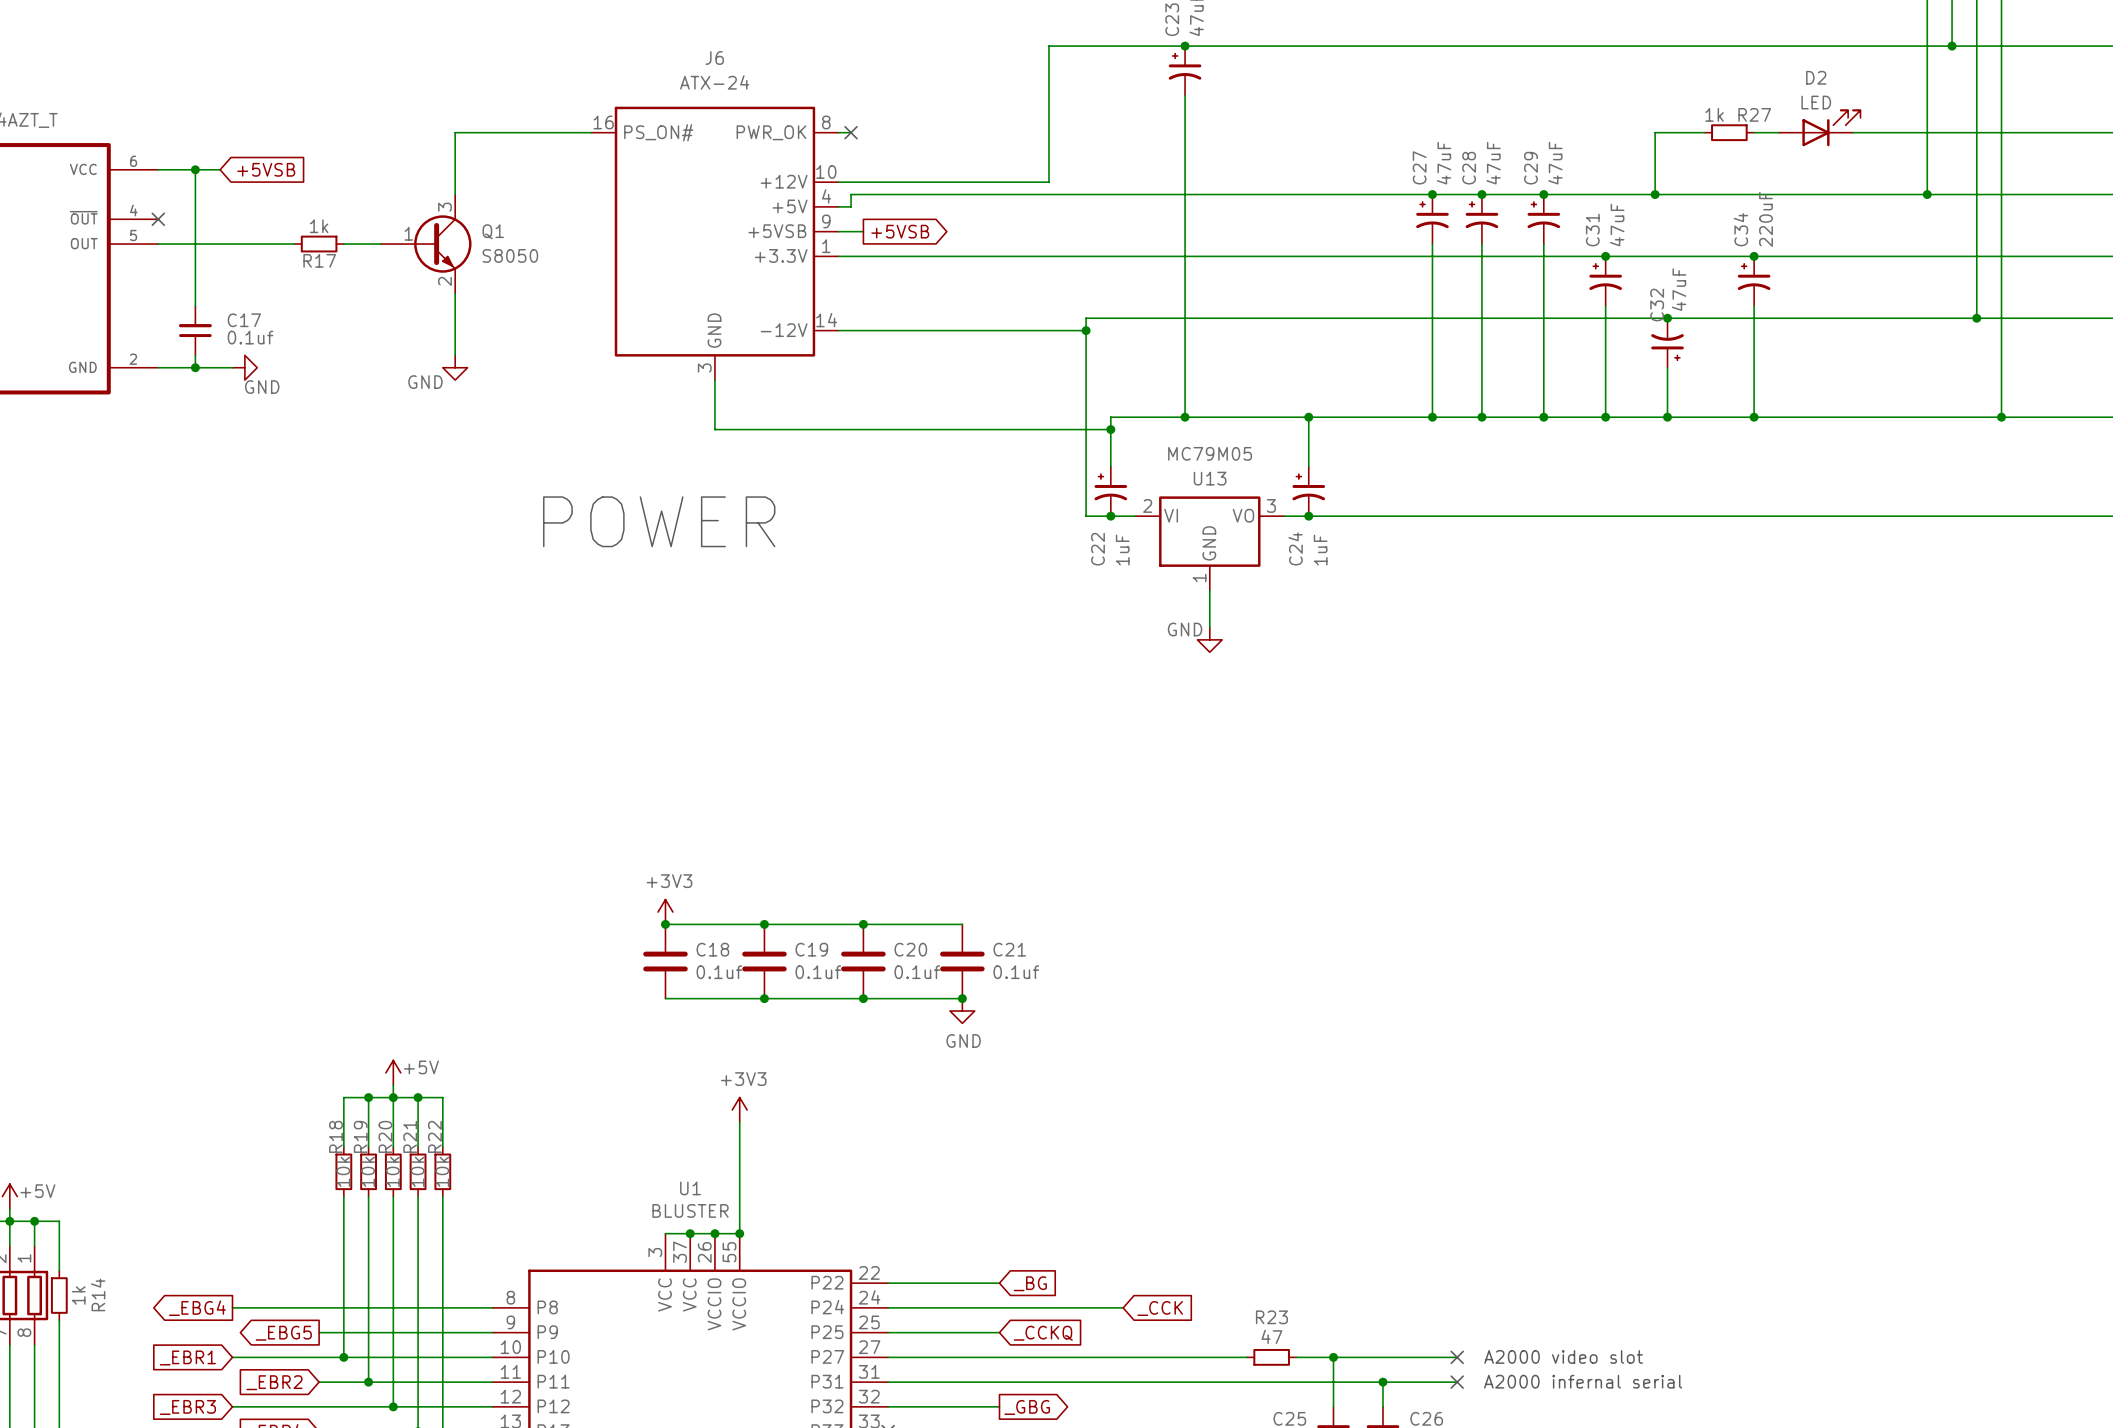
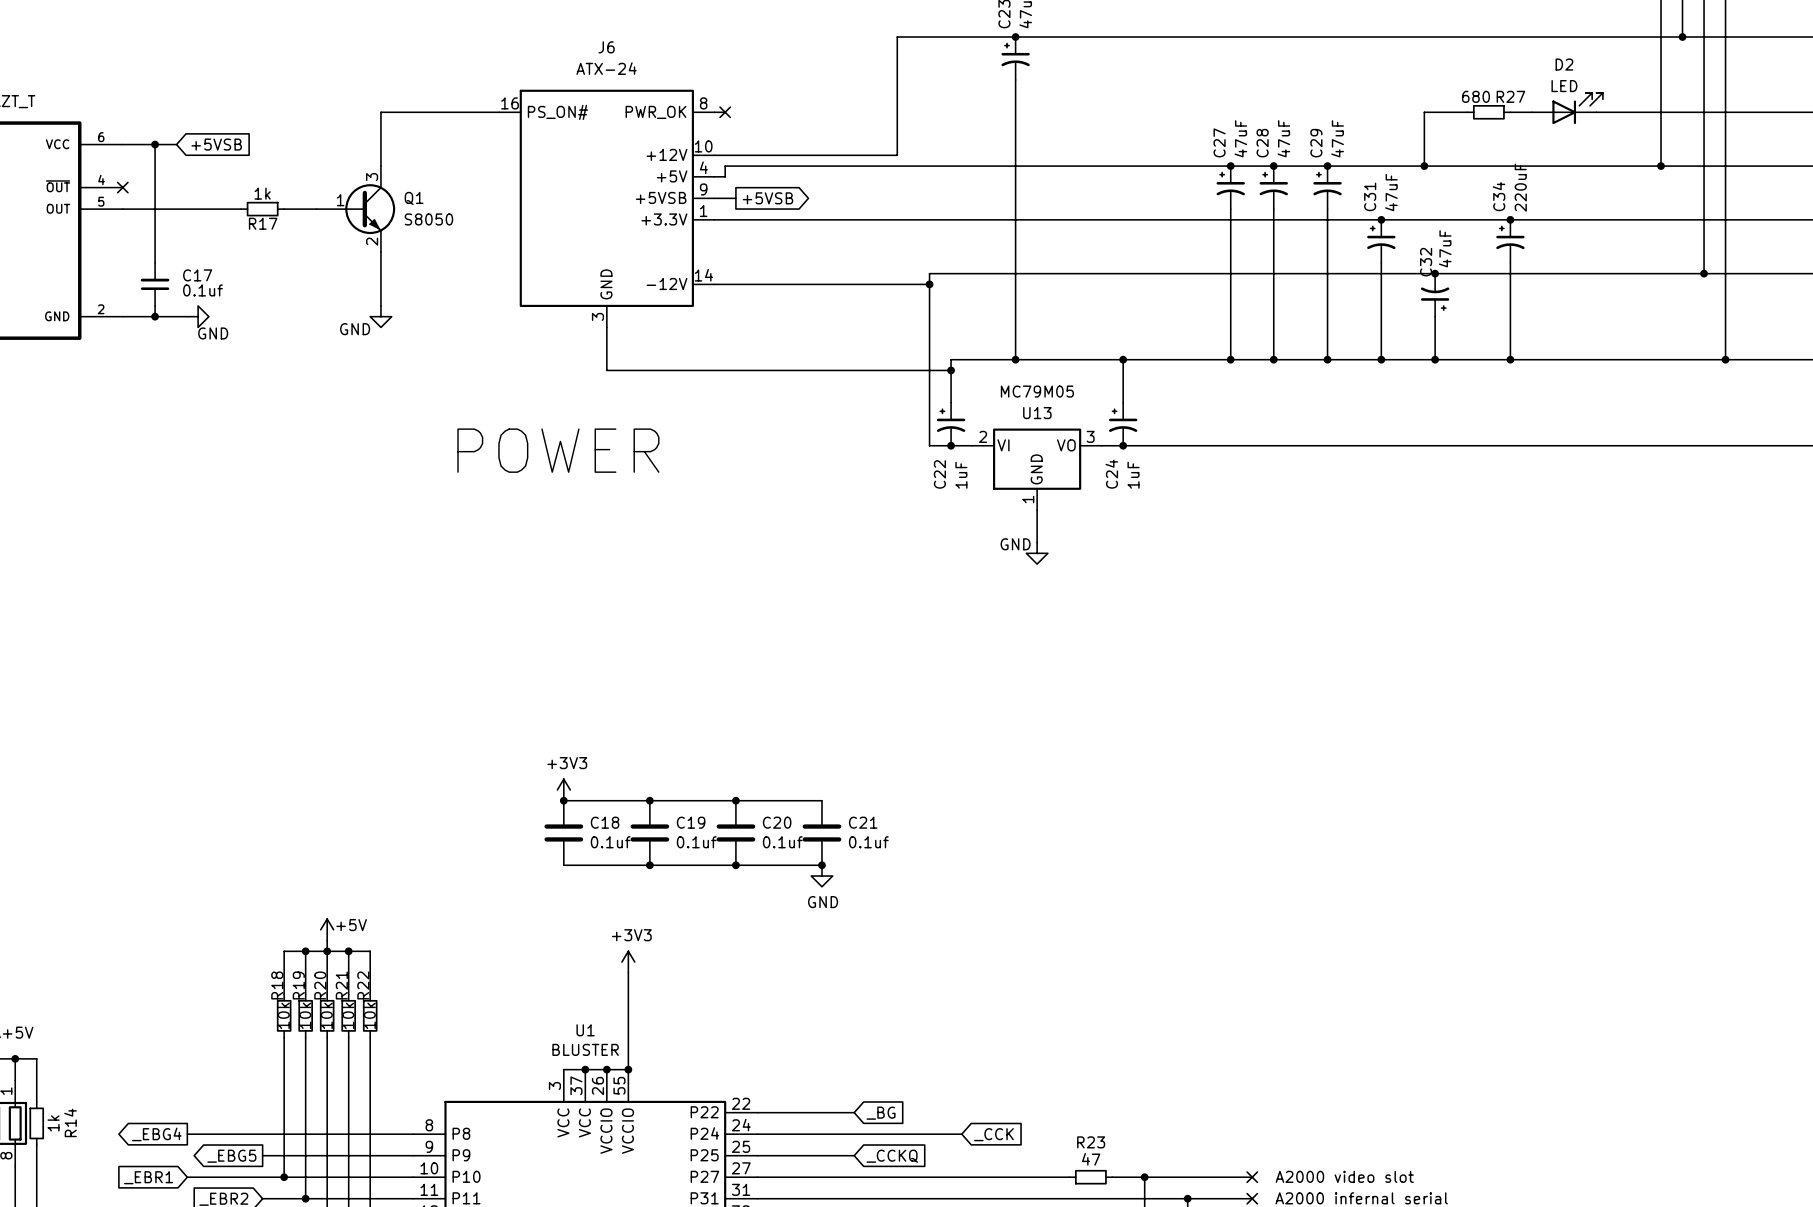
R27 value: 1k (1714, 114) -> 680 (1475, 96)

